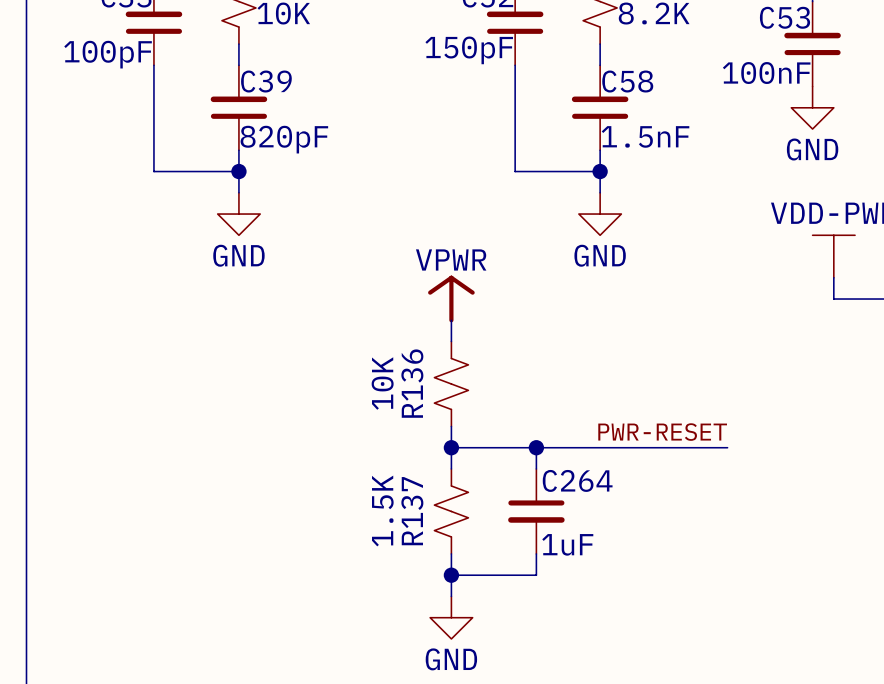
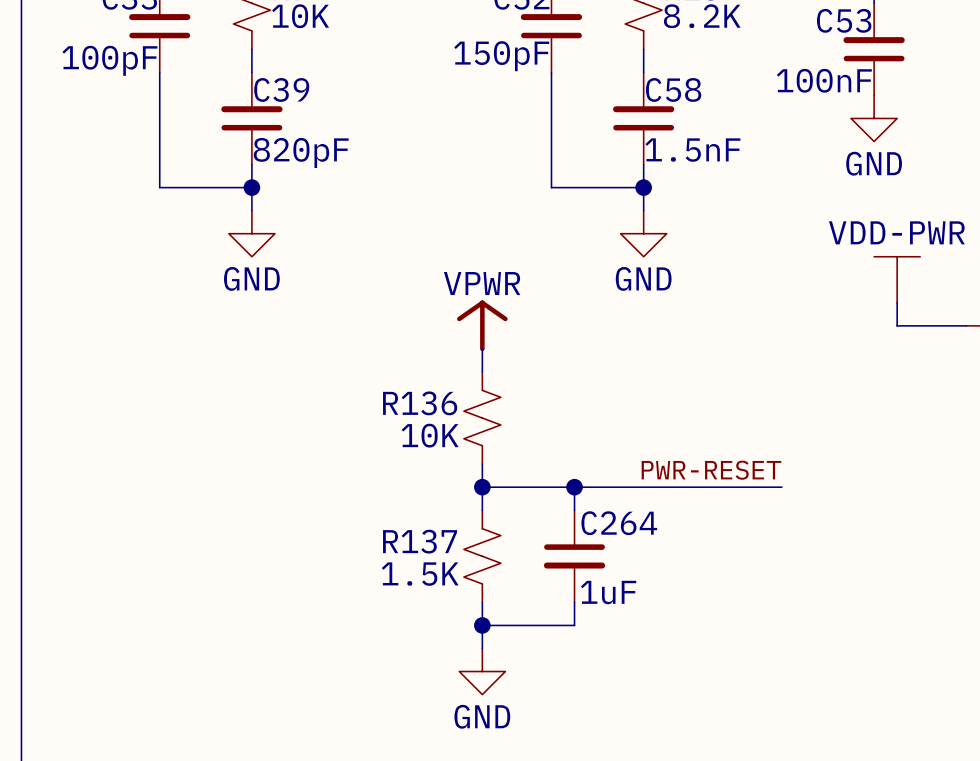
R136 value rotation: 0° (382, 383) -> 90° clockwise (430, 435)
R136 name rotation: 0° (412, 383) -> 90° clockwise (420, 403)
R137 value rotation: 0° (382, 511) -> 90° clockwise (420, 574)
R137 name rotation: 0° (412, 511) -> 90° clockwise (420, 541)

